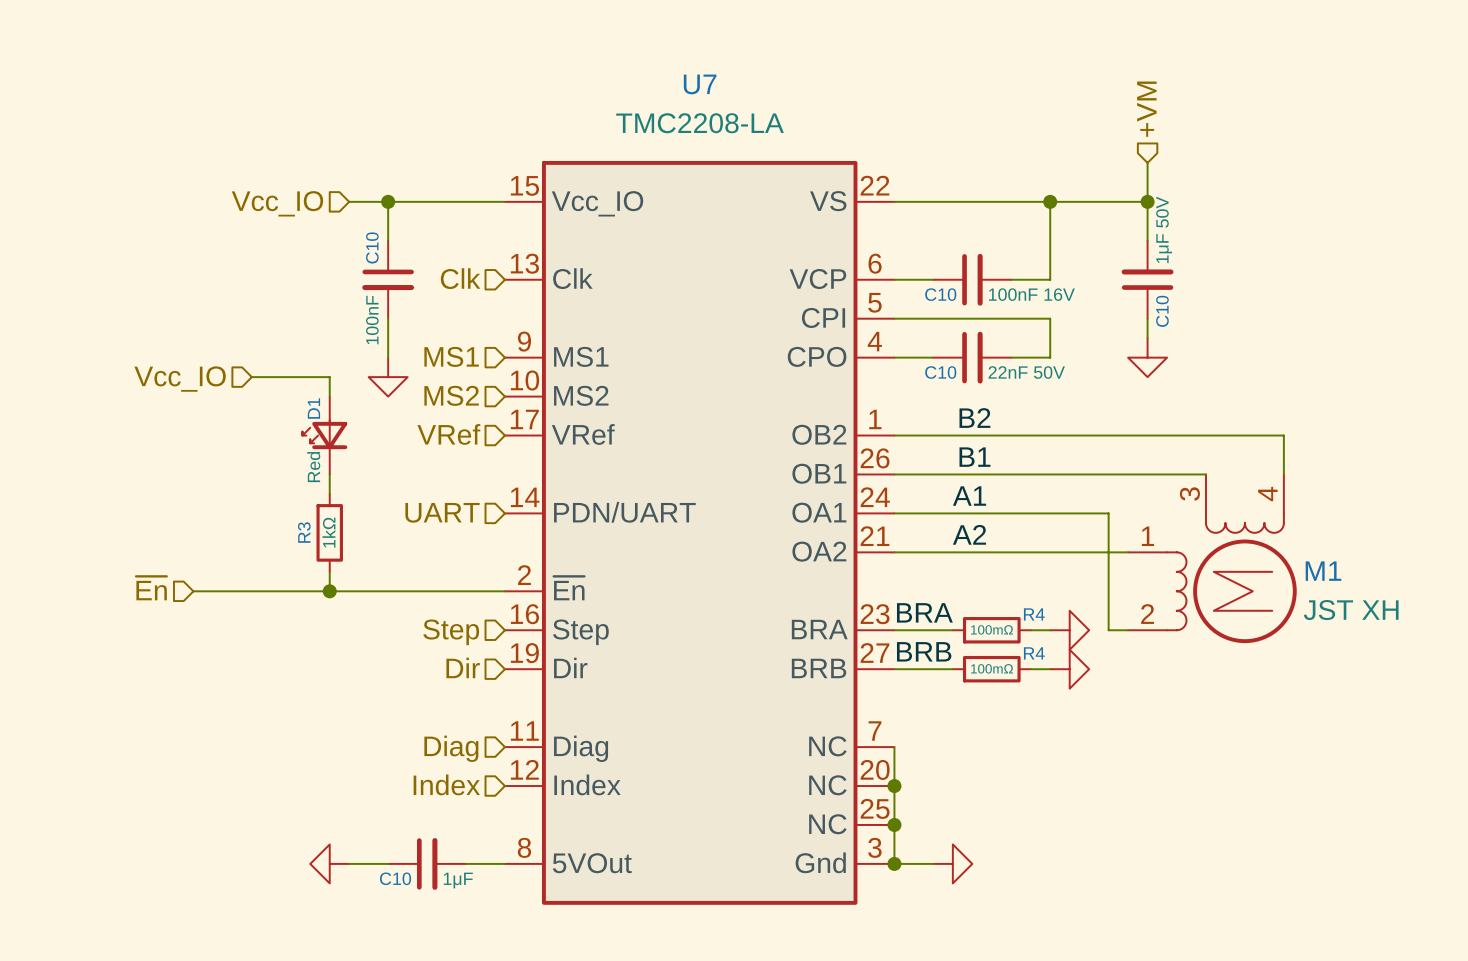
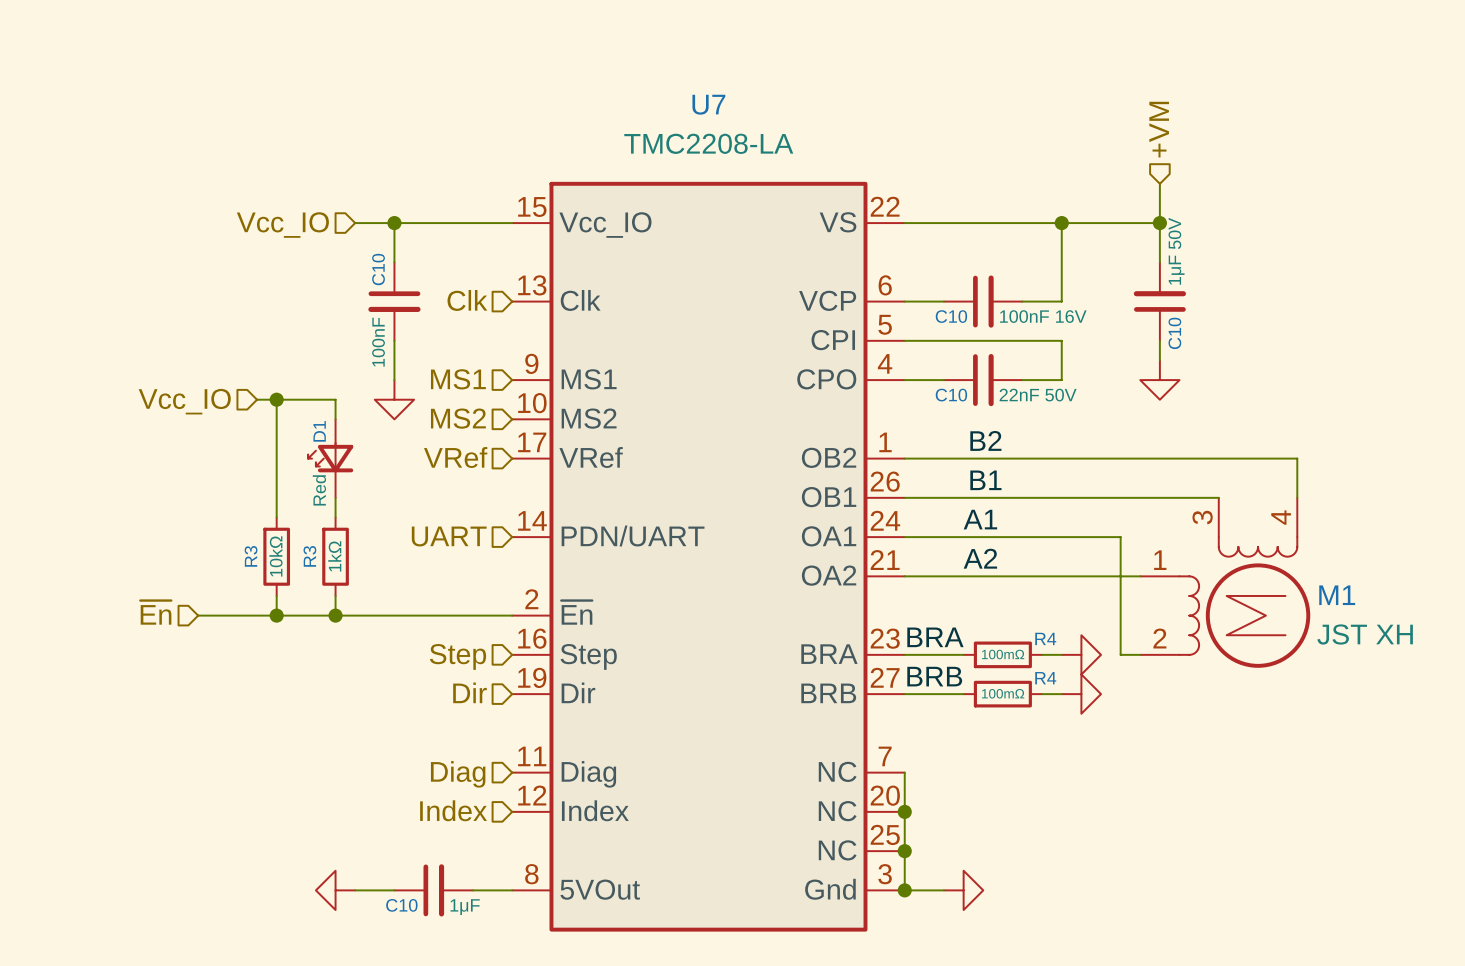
wire: none -> (276, 399) (276, 517)
junction: none -> (276, 399)
R3: none -> 10kΩ (276, 556)
wire: none -> (276, 595) (276, 615)
junction: none -> (276, 615)

